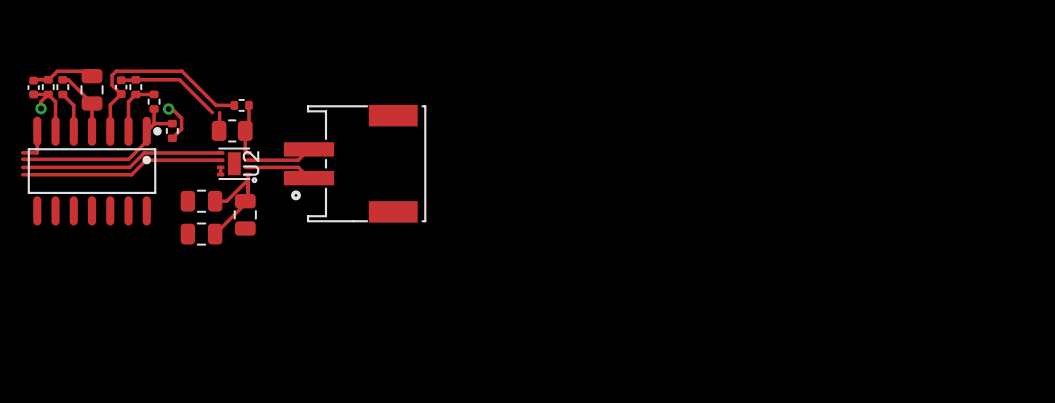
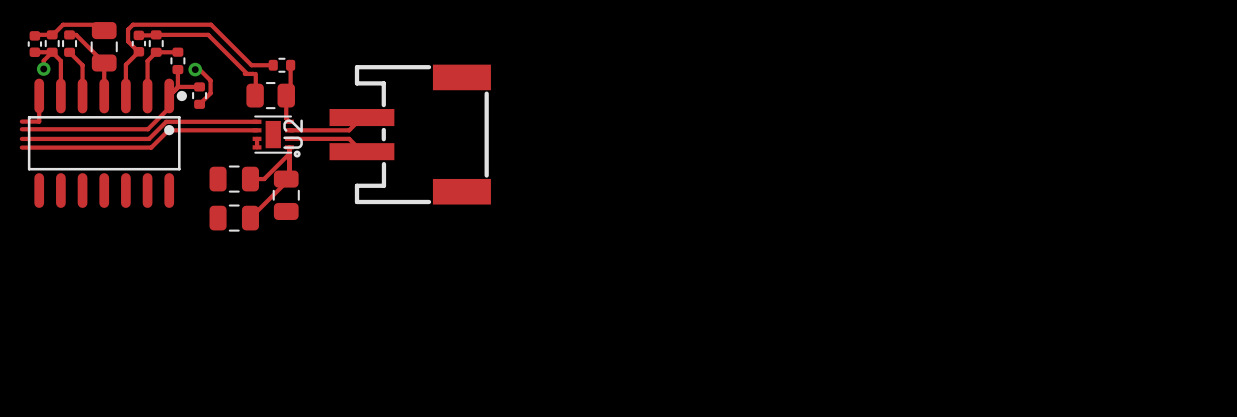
U2 footprint: [283, 104, 427, 223] -> [329, 64, 491, 205]
part: none -> (249, 73)

